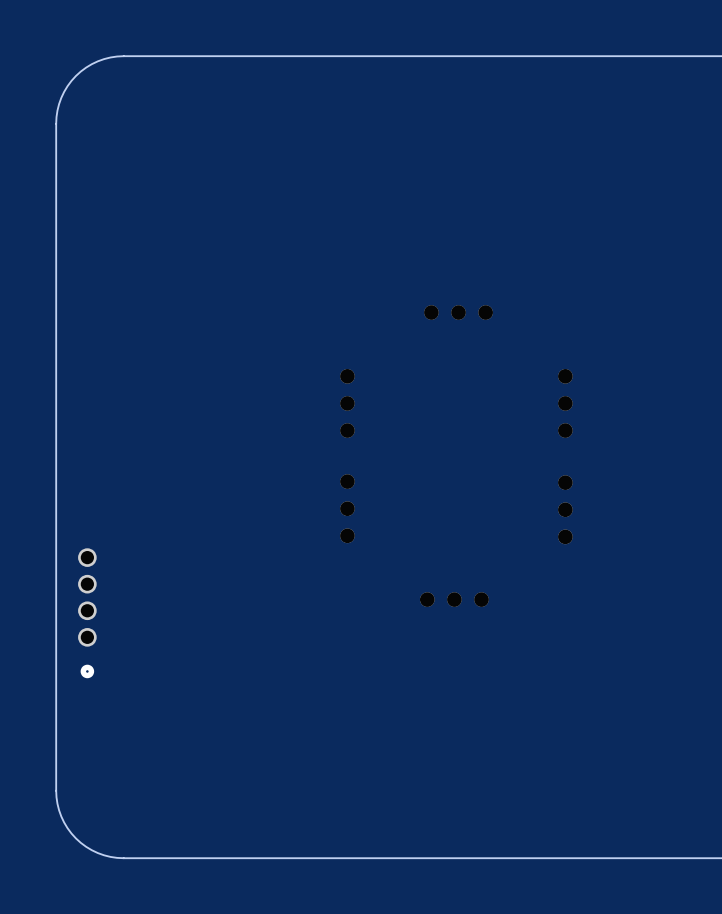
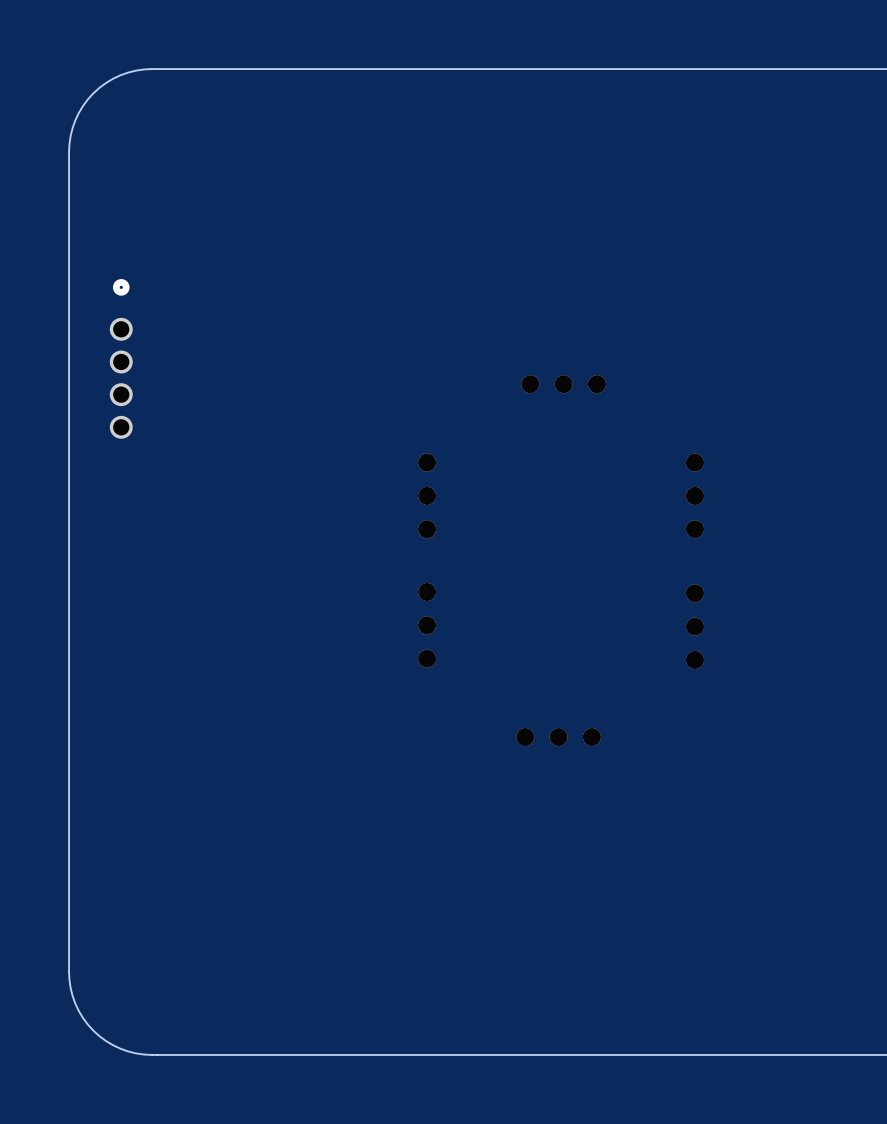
part: none -> (121, 358)
part: (87, 613) -> none

